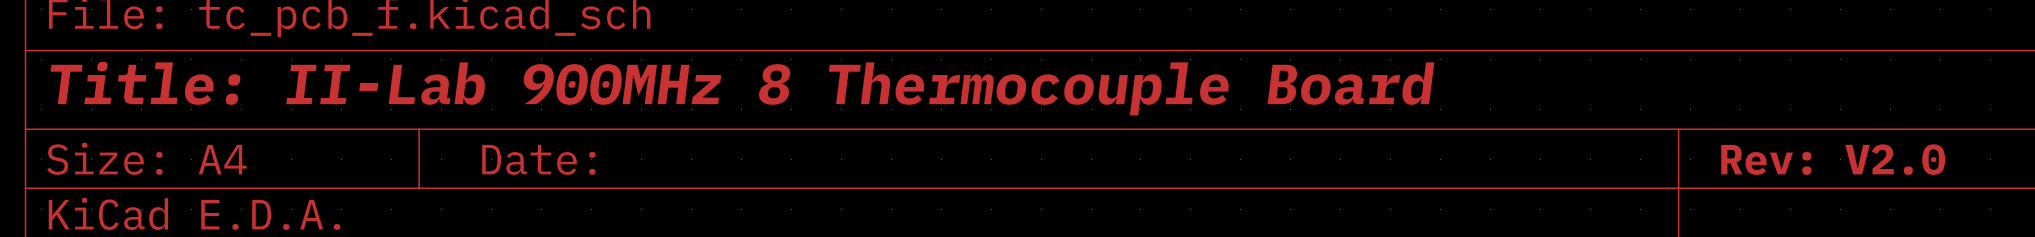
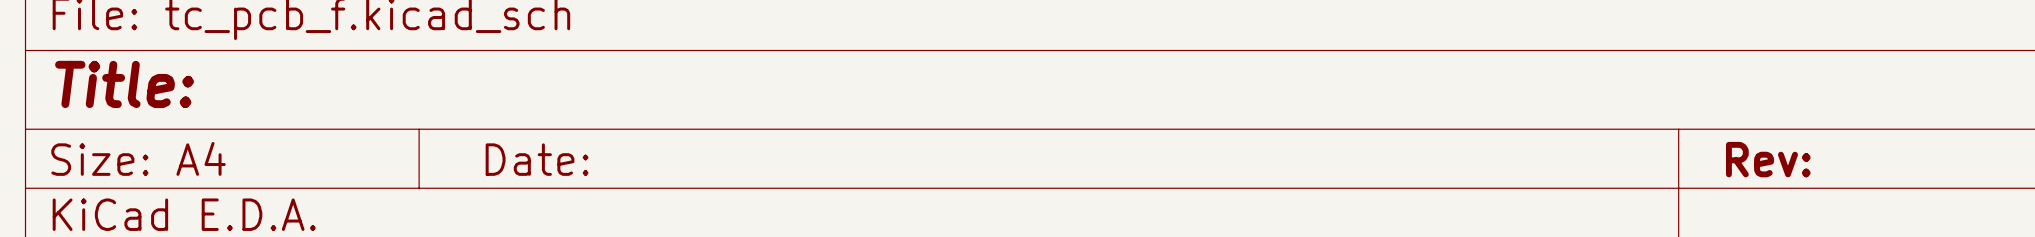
title block: Title: II-Lab 900MHz 8 Thermocouple Board (742, 88) -> Title: (124, 84)
title block: Rev: V2.0 (1833, 159) -> Rev: (1768, 159)

